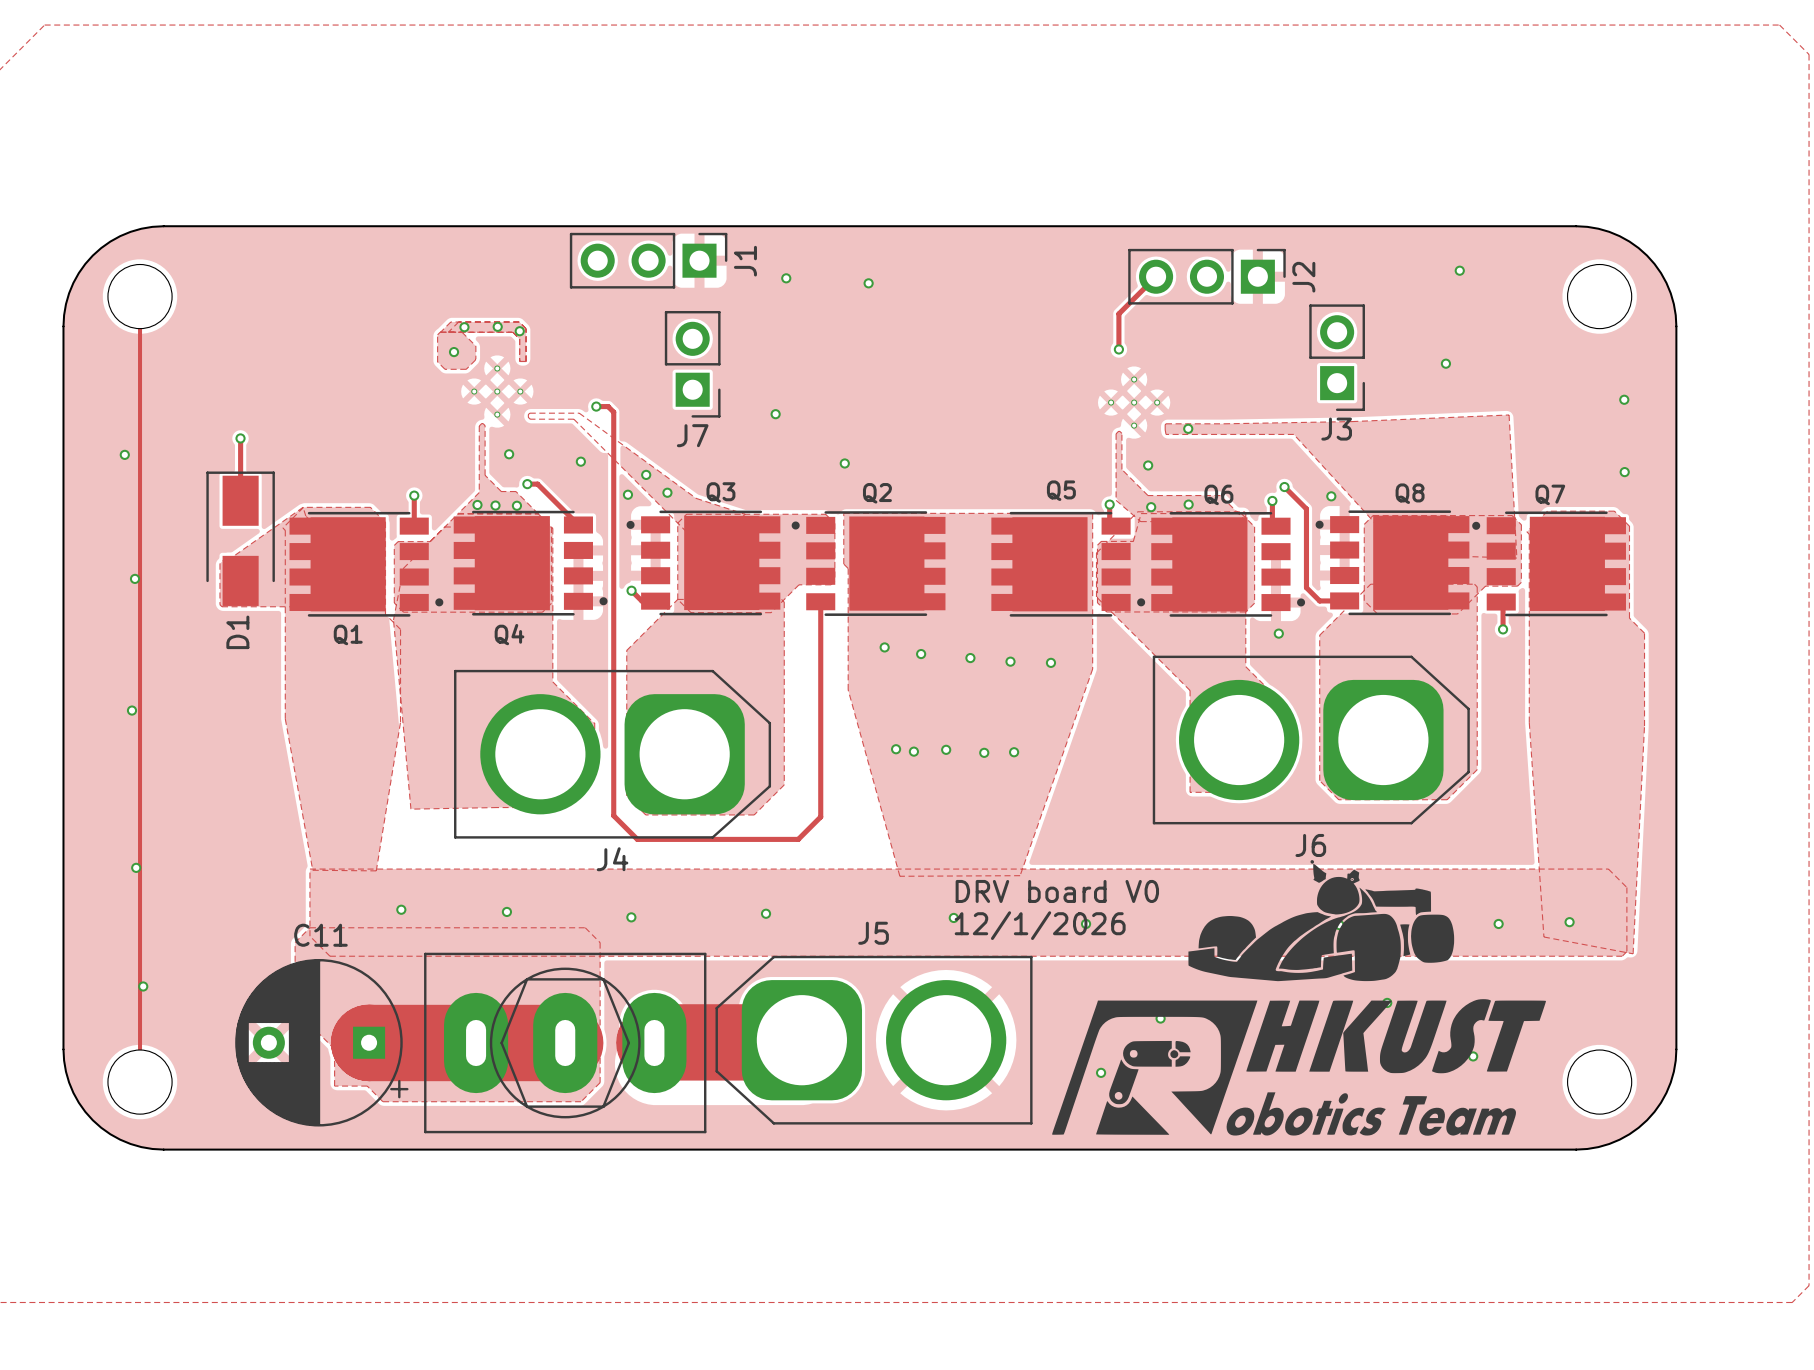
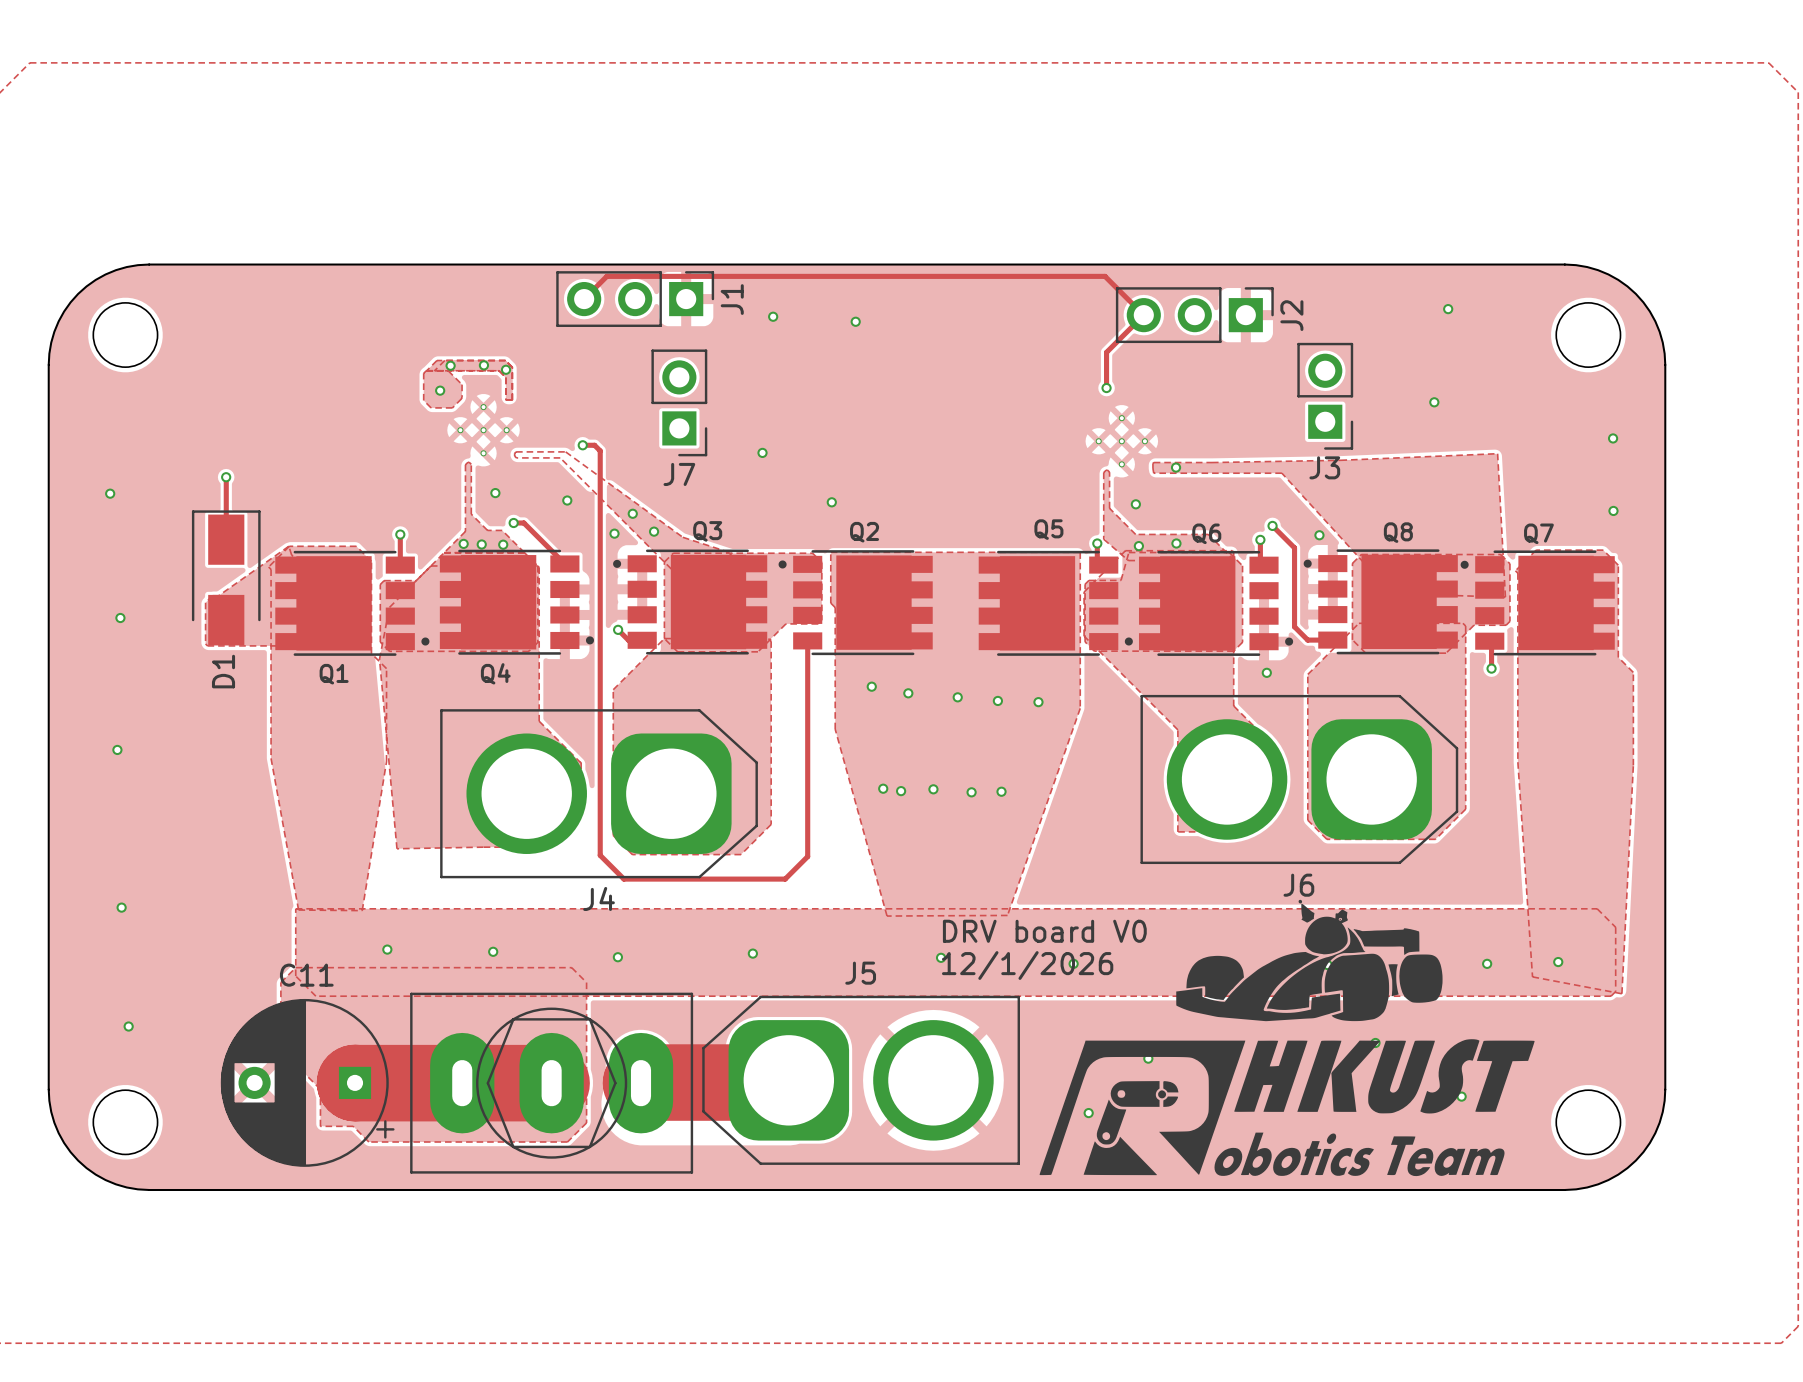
track: none -> (584, 299) (606, 276) (1105, 276) (1143, 315)
track: (140, 296) (140, 1082) -> none

